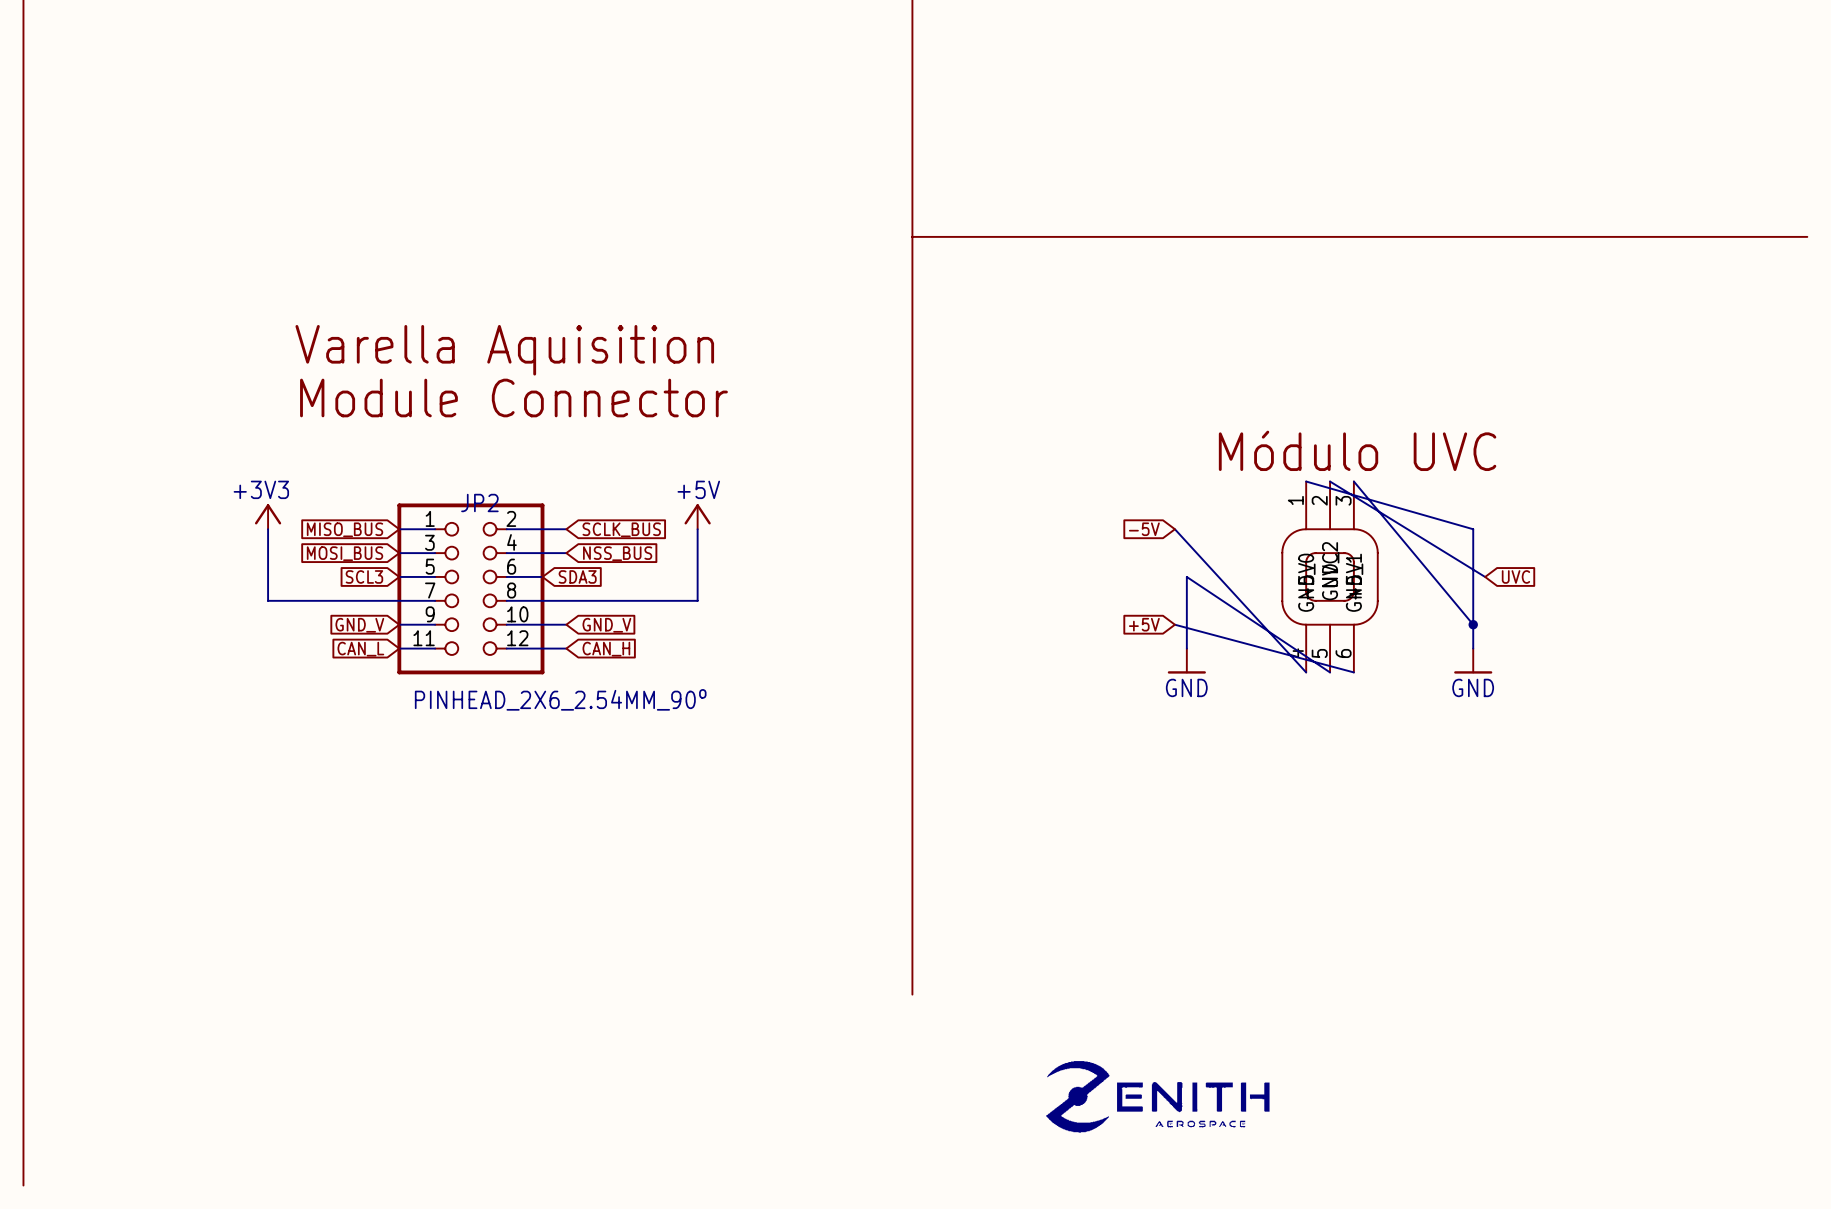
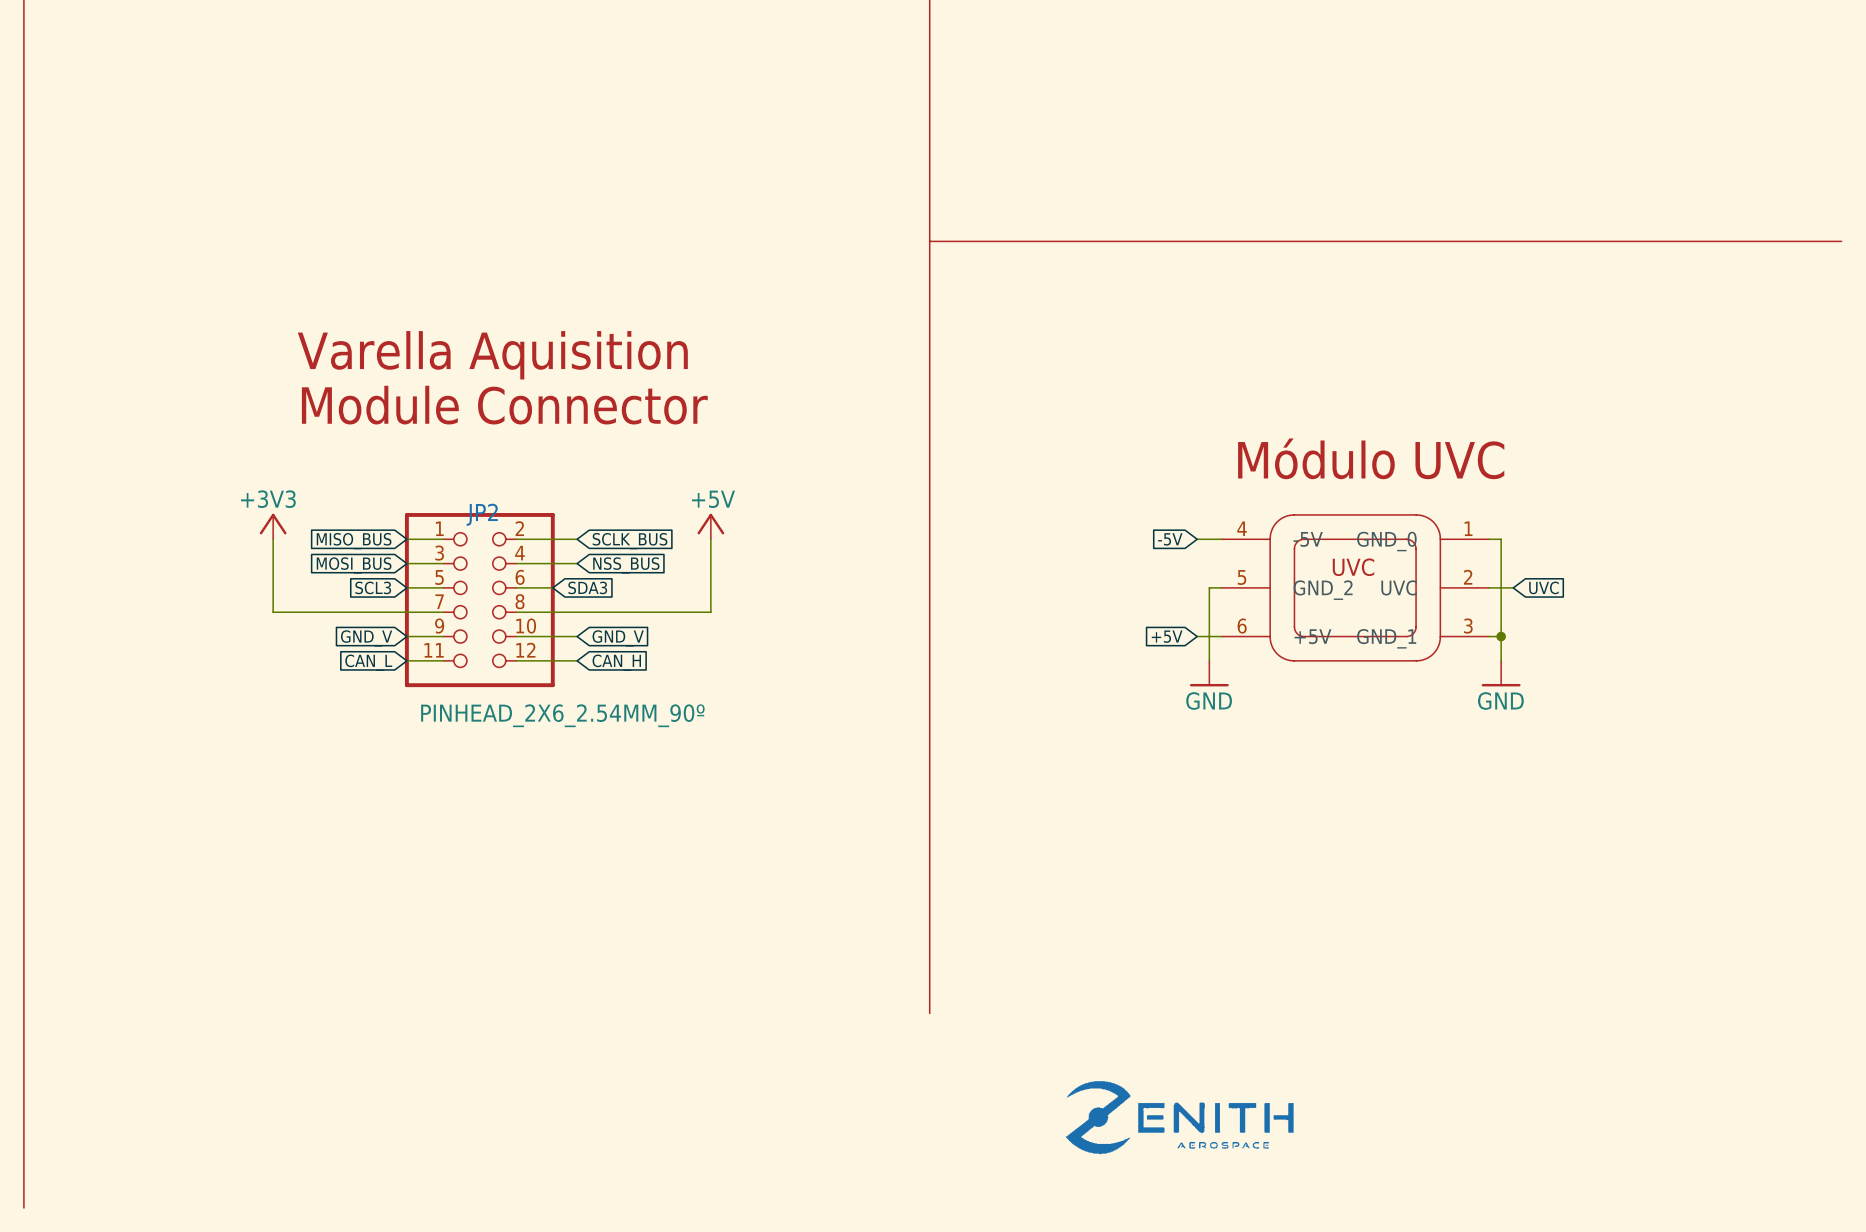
part symbol: [1281, 481, 1379, 673] -> [1221, 514, 1489, 662]
wire: (1306, 481) (1473, 529) -> (1488, 539) (1501, 539)
wire: (1330, 481) (1485, 576) -> (1488, 587) (1513, 587)
wire: (1353, 481) (1473, 624) -> (1488, 636) (1501, 636)
wire: (1174, 529) (1306, 672) -> (1197, 539) (1221, 539)
wire: (1186, 576) (1330, 672) -> (1209, 587) (1221, 587)
wire: (1174, 624) (1353, 672) -> (1197, 636) (1221, 636)

